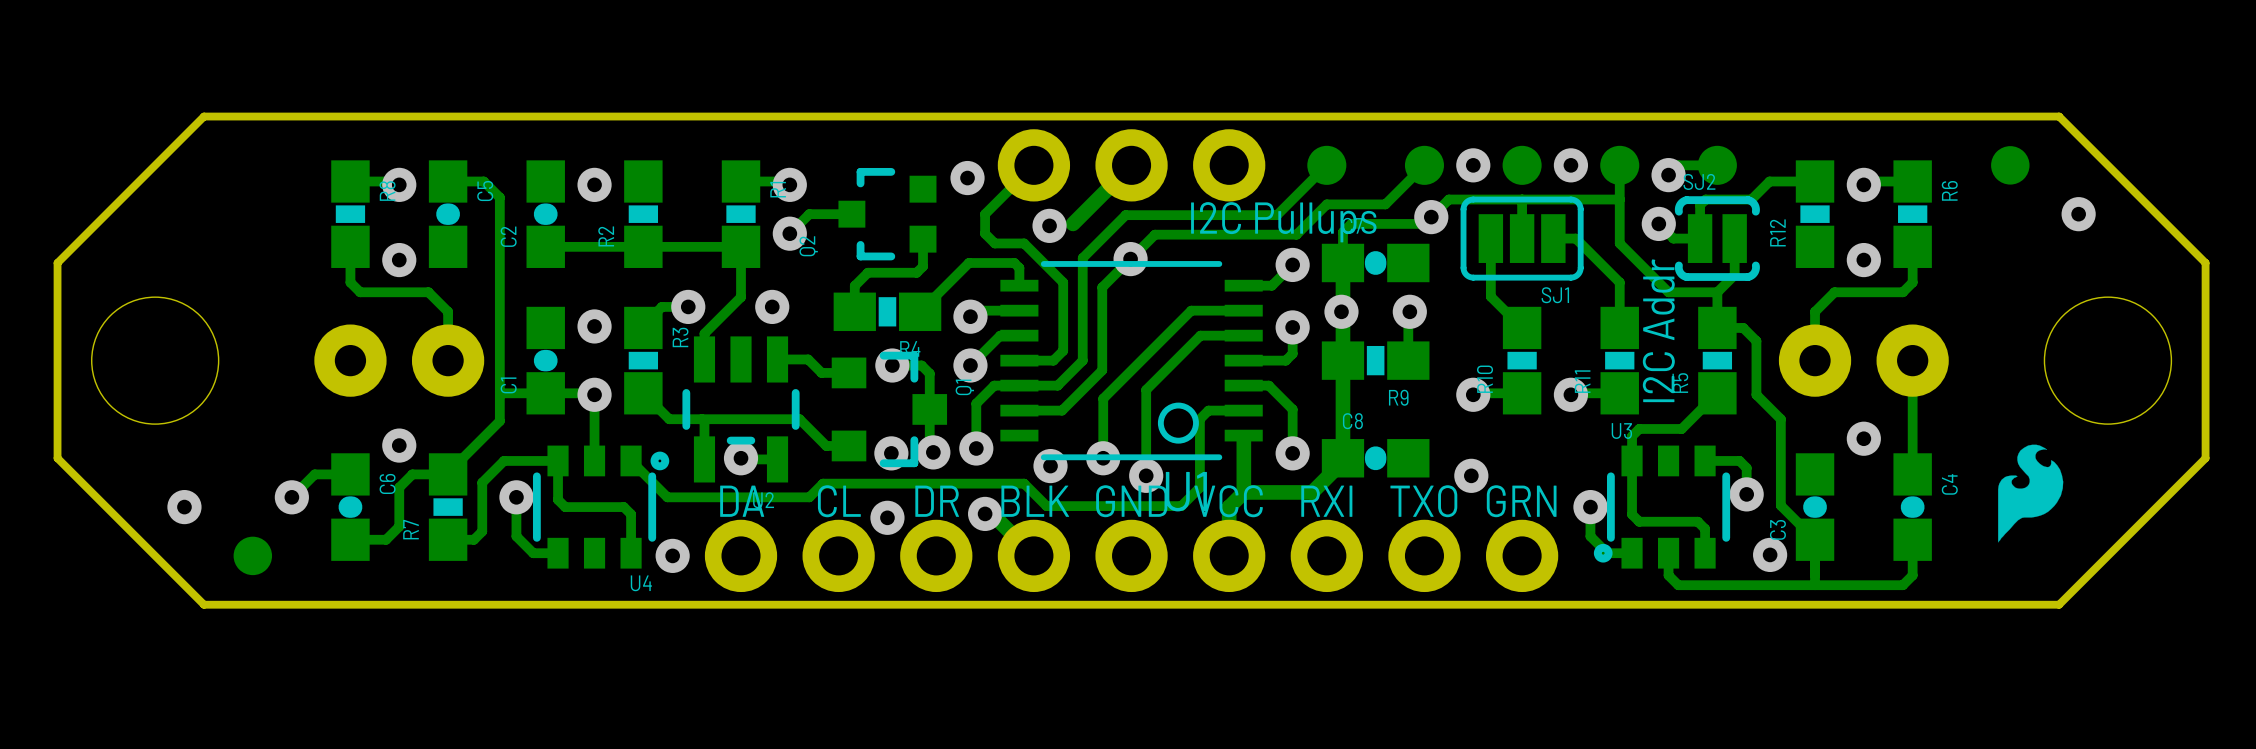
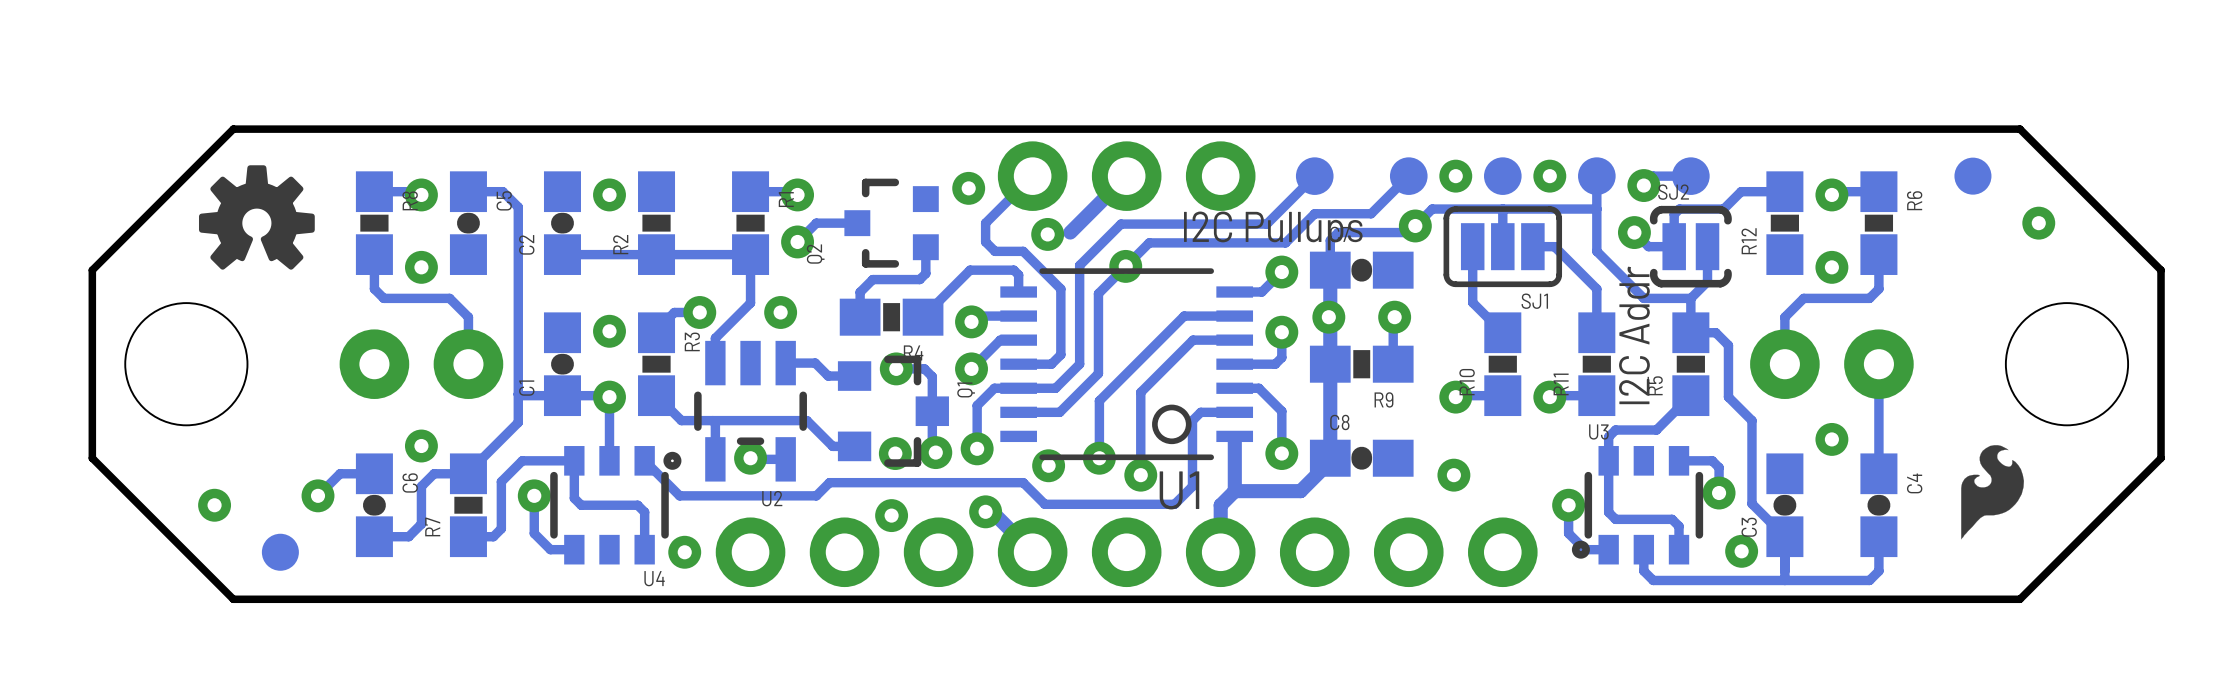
drawing: none -> [198, 165, 315, 270]
text: DA (742, 501) -> none
text: CL (839, 501) -> none
text: DR (937, 501) -> none
text: BLK (1035, 501) -> none
text: GND (1131, 501) -> none
text: VCC (1228, 501) -> none
text: RXI (1326, 501) -> none
text: TXO (1423, 501) -> none
text: GRN (1521, 501) -> none

